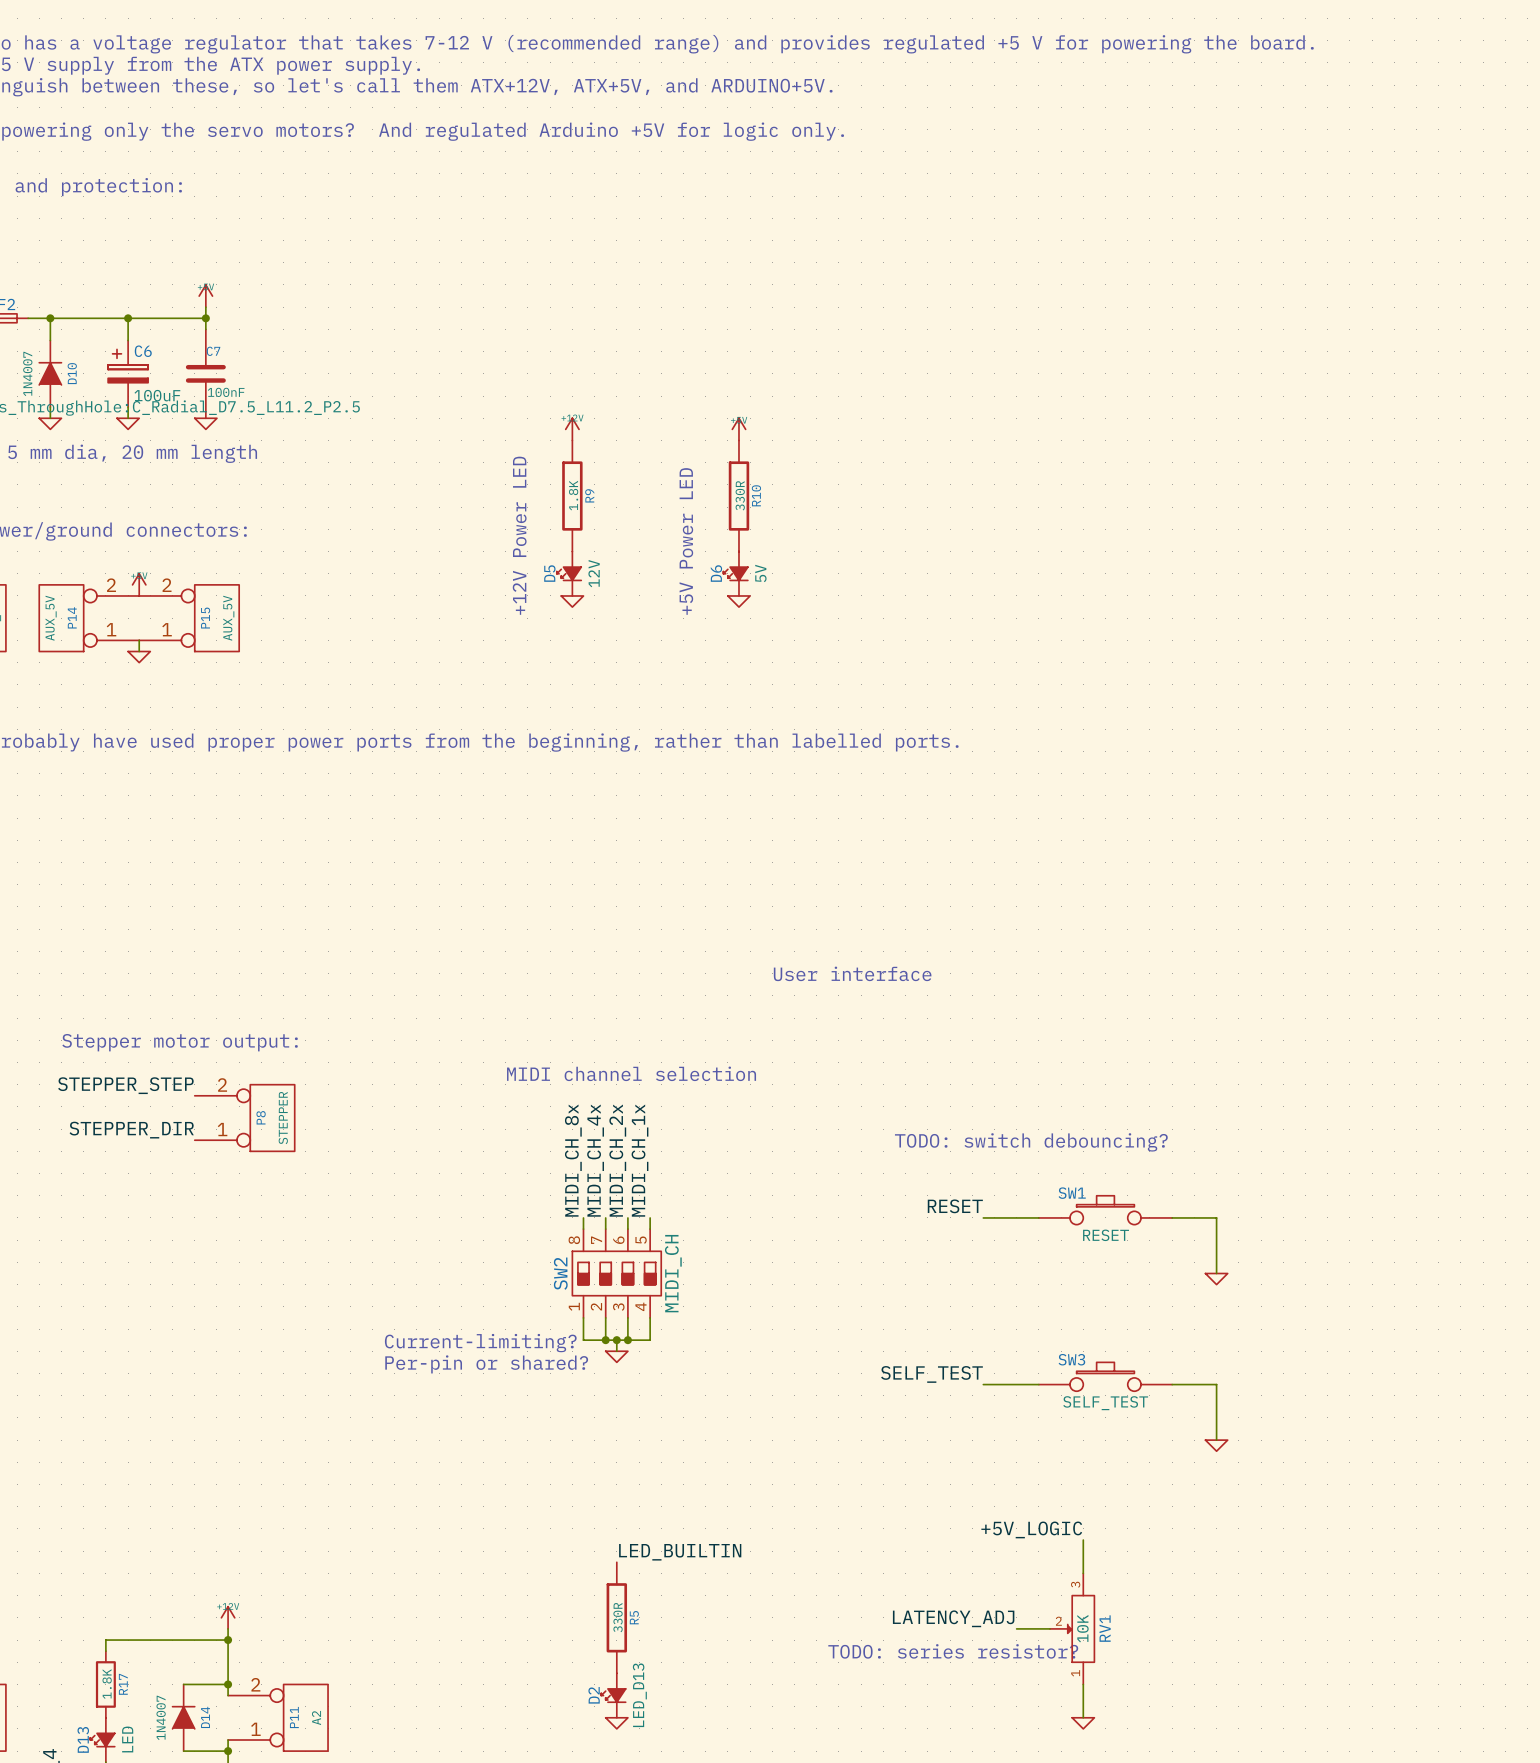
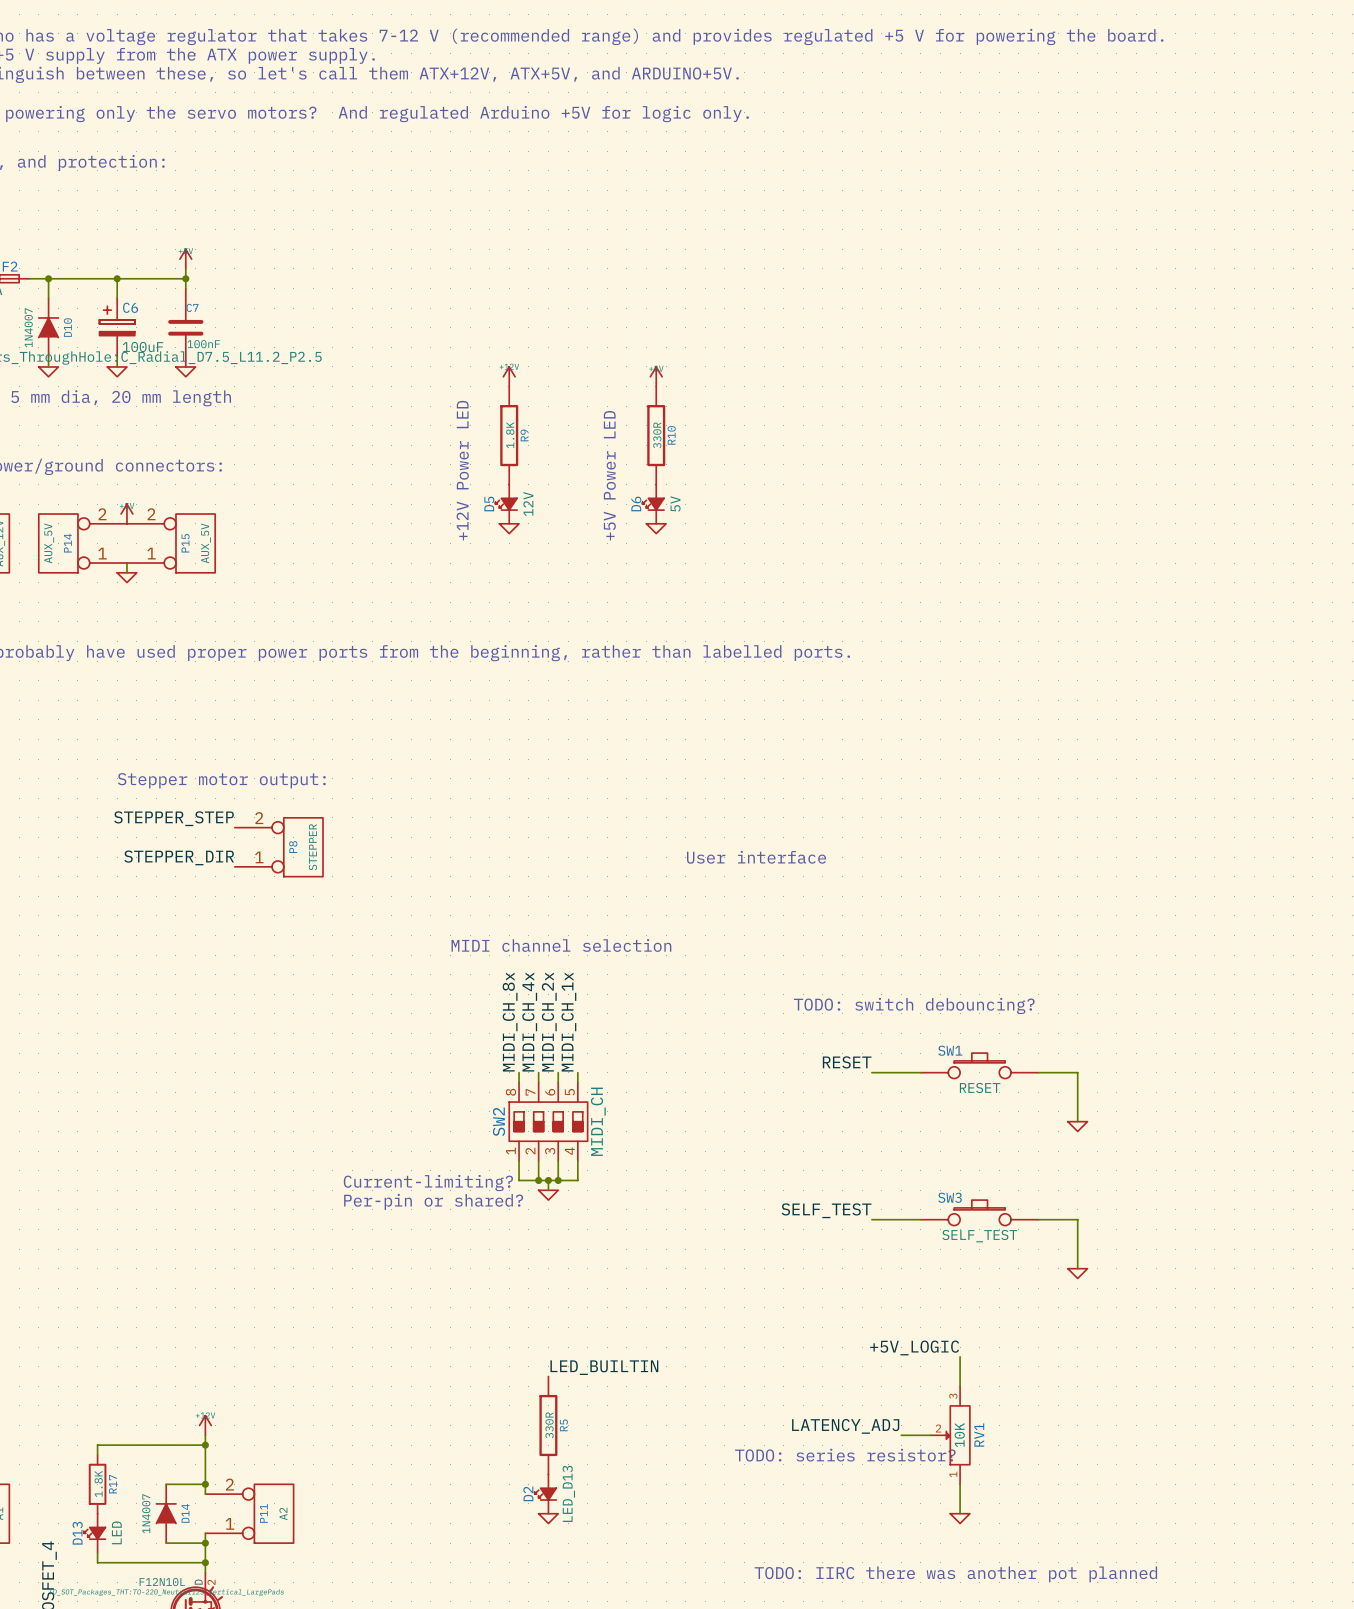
text position: Stepper motor output: (180, 1042) -> Stepper motor output: (221, 780)
label position: STEPPER_STEP (125, 1085) -> STEPPER_STEP (174, 818)
P8 position: (244, 1118) -> (278, 847)
label position: STEPPER_DIR (131, 1130) -> STEPPER_DIR (179, 857)

